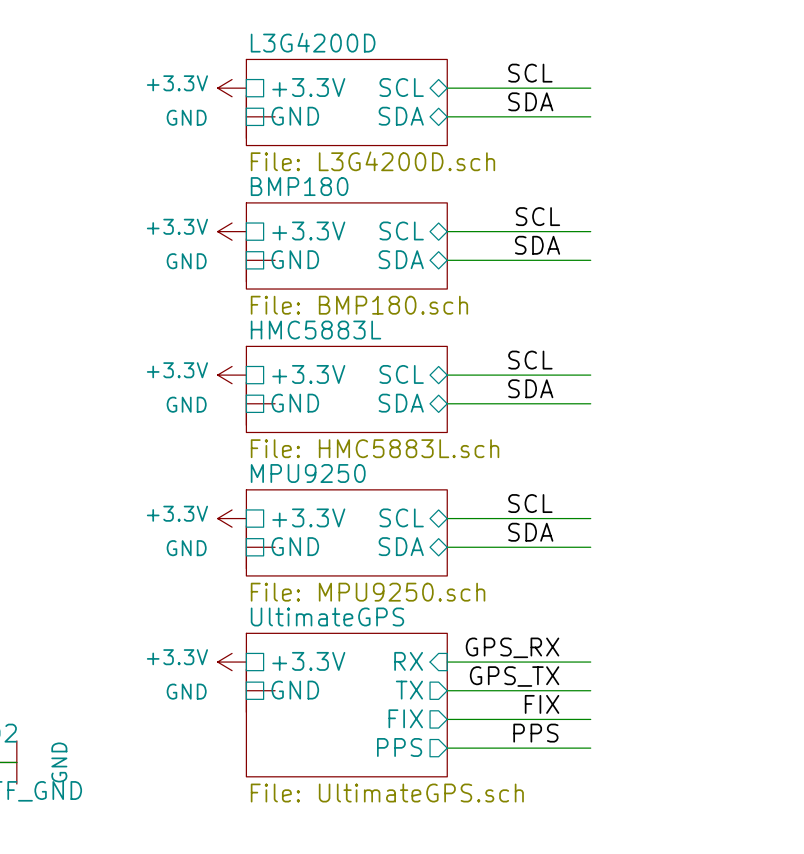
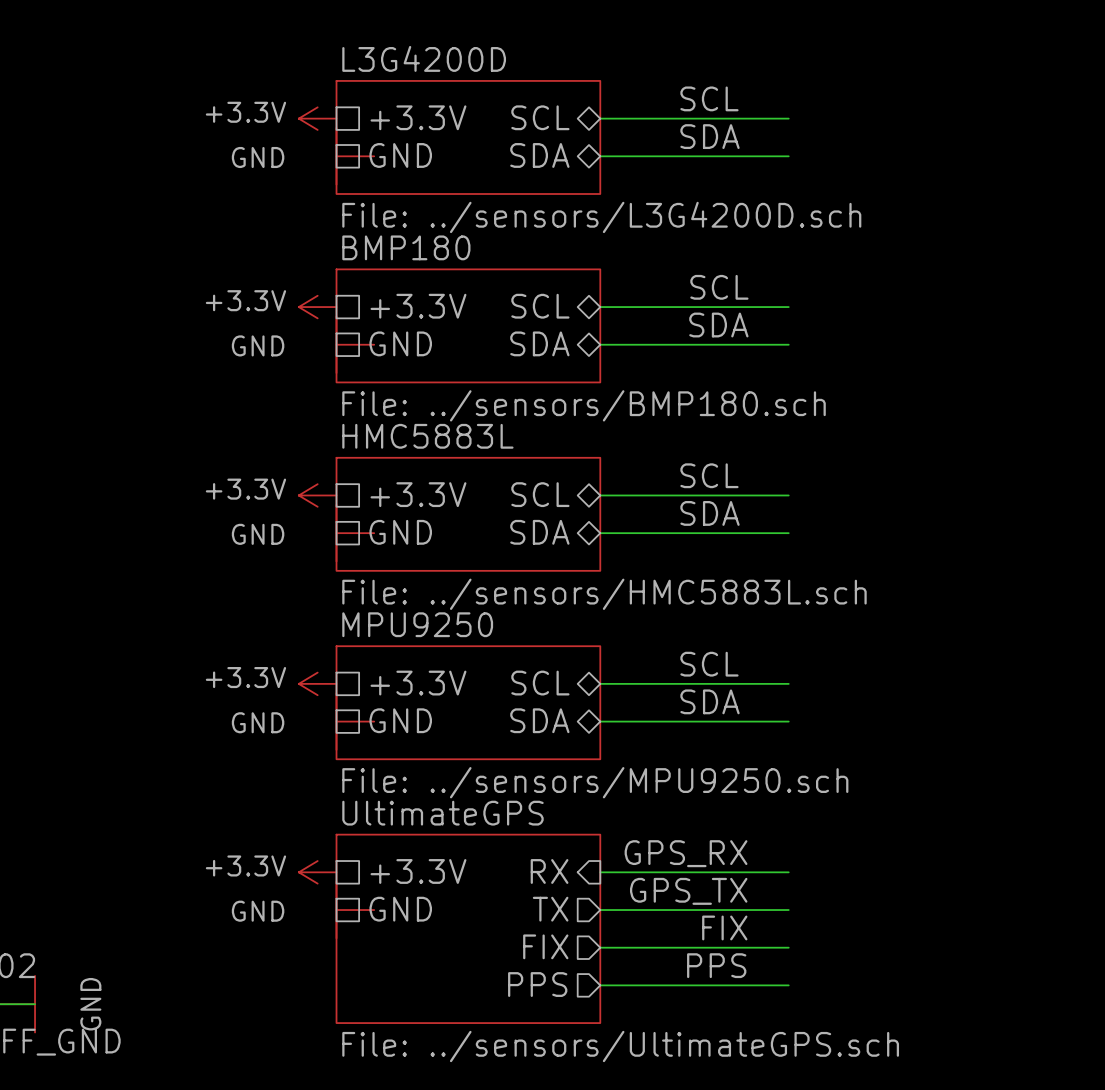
sheet L3G4200D value: File: L3G4200D.sch (372, 161) -> File: ../sensors/L3G4200D.sch (601, 217)
sheet BMP180 value: File: BMP180.sch (359, 305) -> File: ../sensors/BMP180.sch (584, 405)
sheet HMC5883L value: File: HMC5883L.sch (375, 448) -> File: ../sensors/HMC5883L.sch (604, 594)
sheet MPU9250 value: File: MPU9250.sch (368, 592) -> File: ../sensors/MPU9250.sch (595, 782)
sheet UltimateGPS value: File: UltimateGPS.sch (387, 793) -> File: ../sensors/UltimateGPS.sch (620, 1046)

